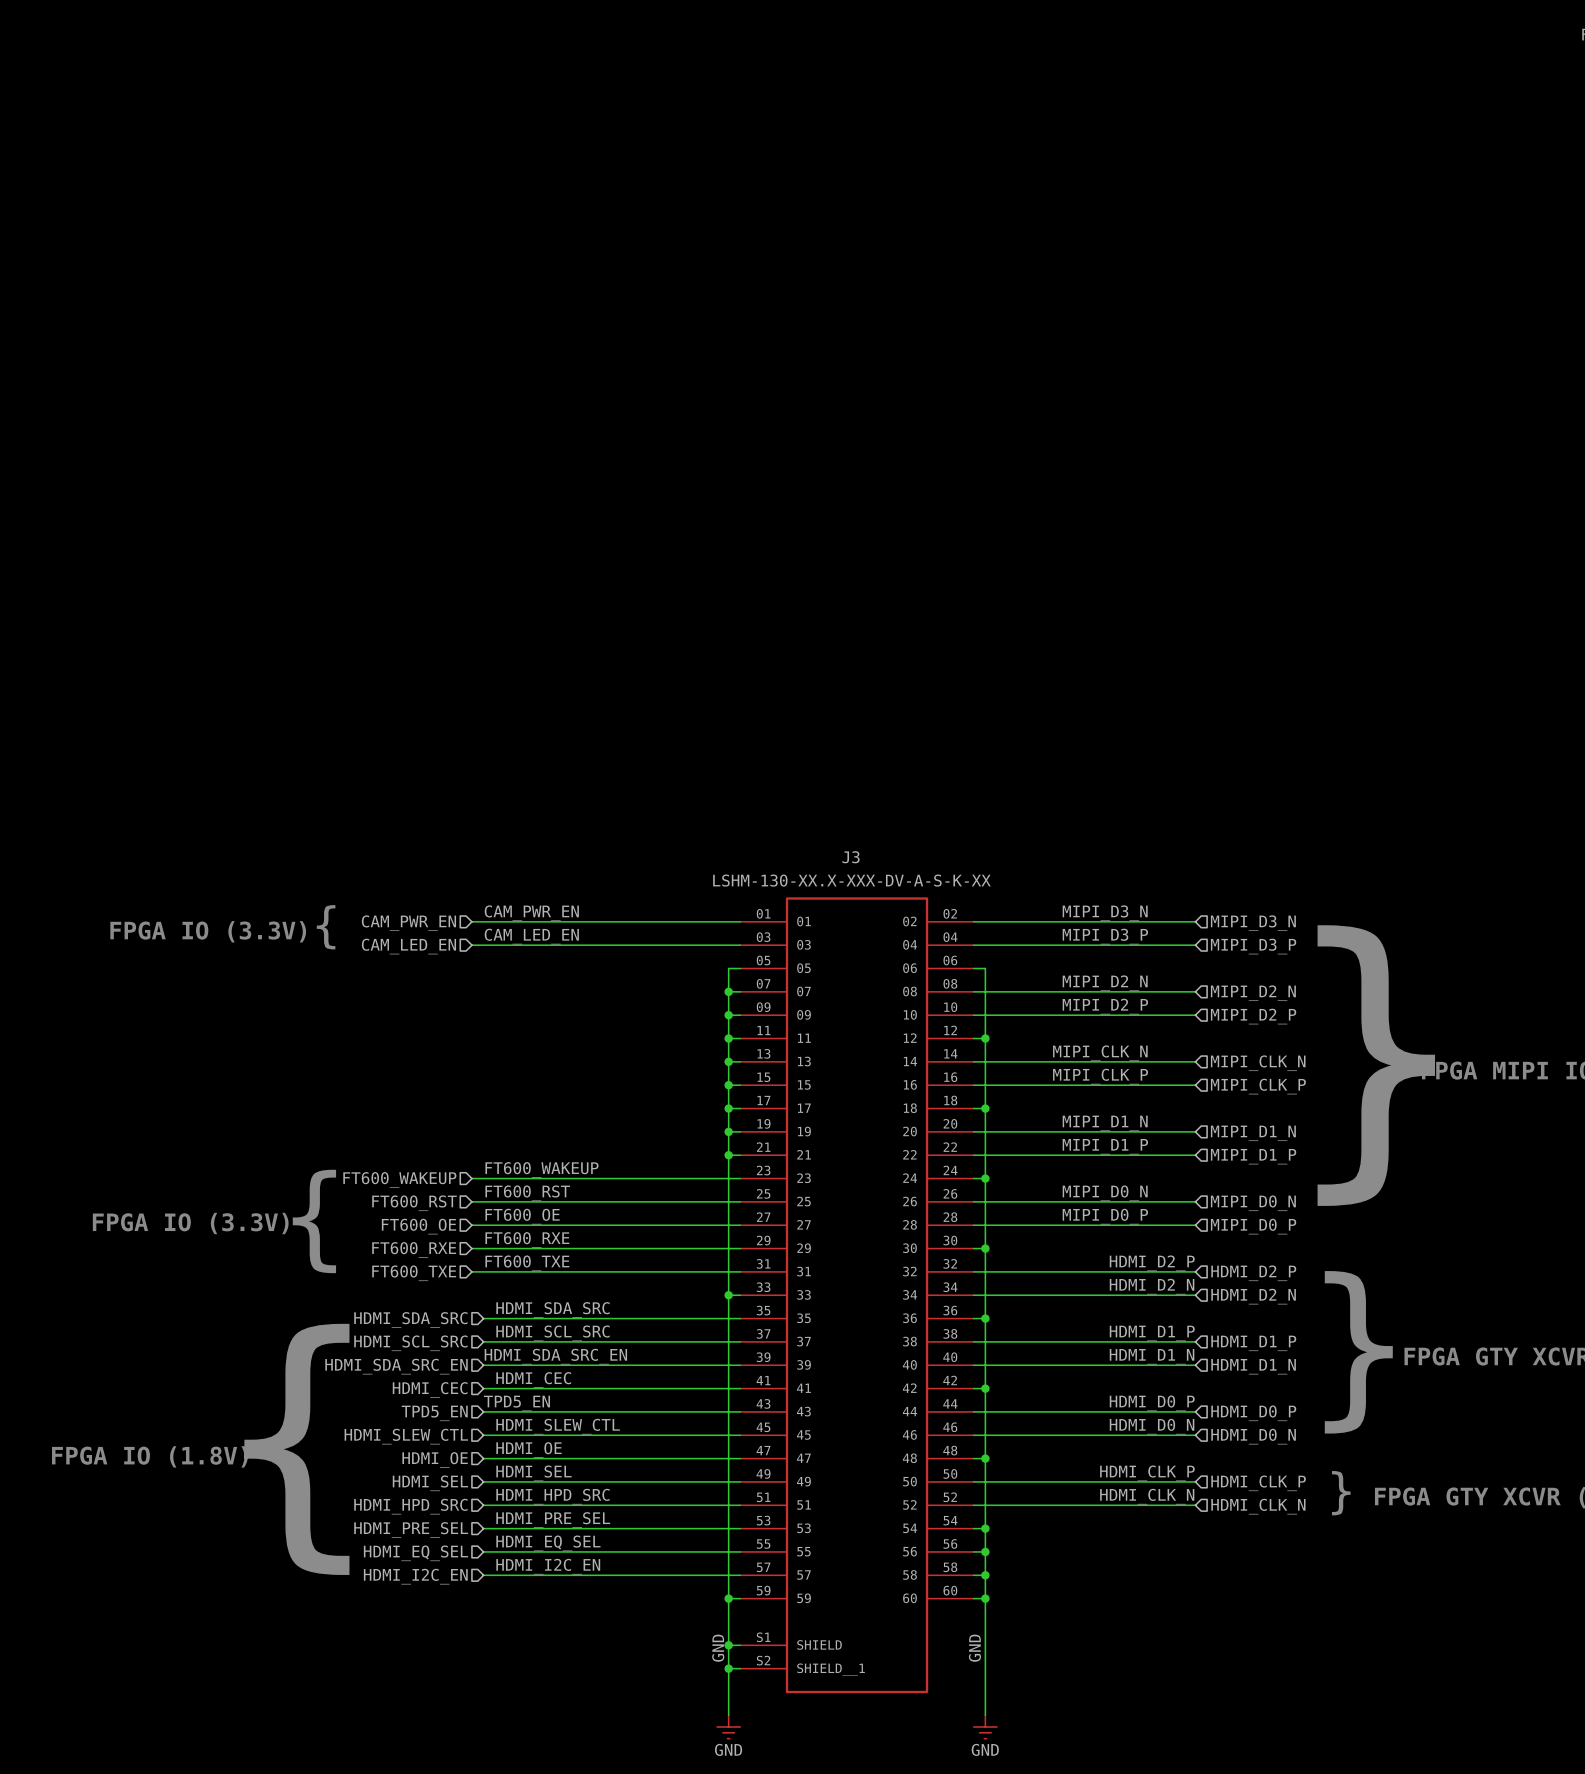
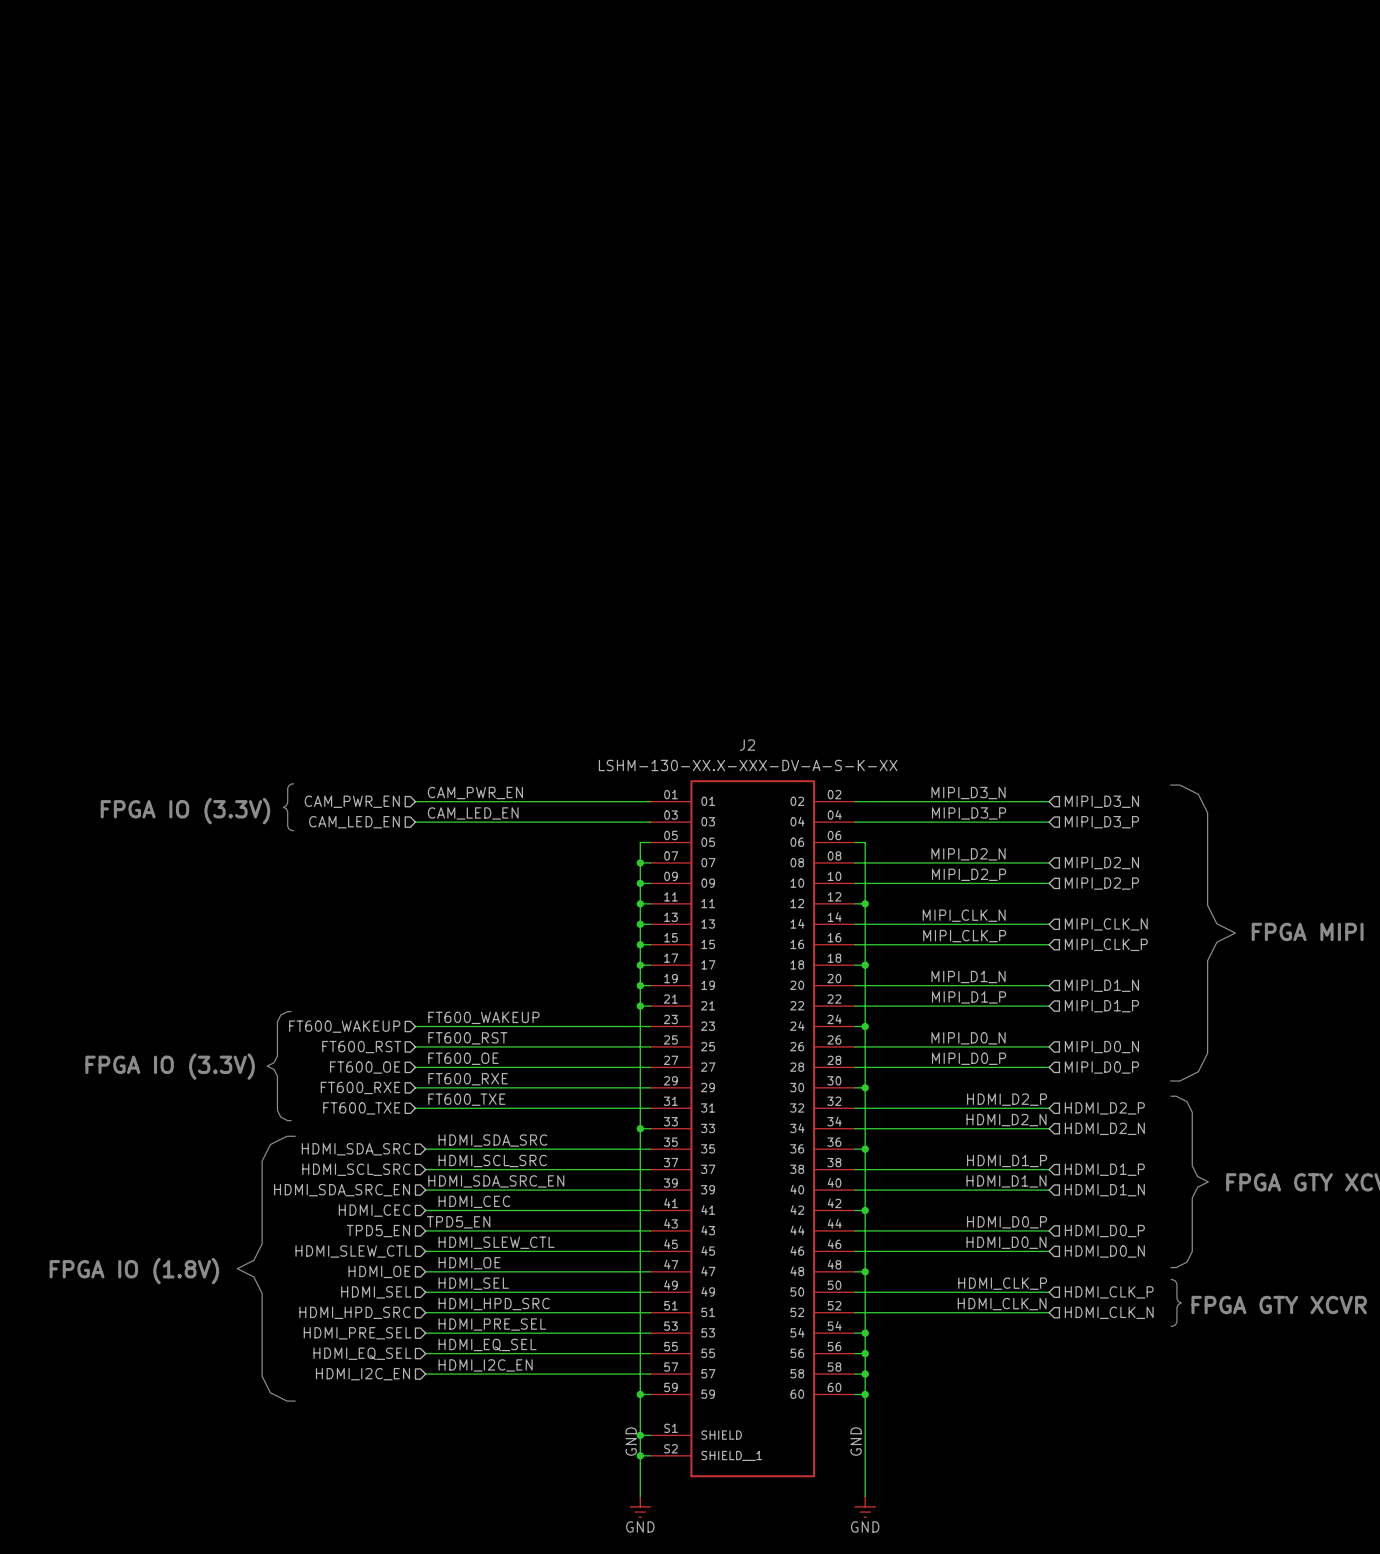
J3 name: J3 (851, 857) -> J2 (747, 745)

